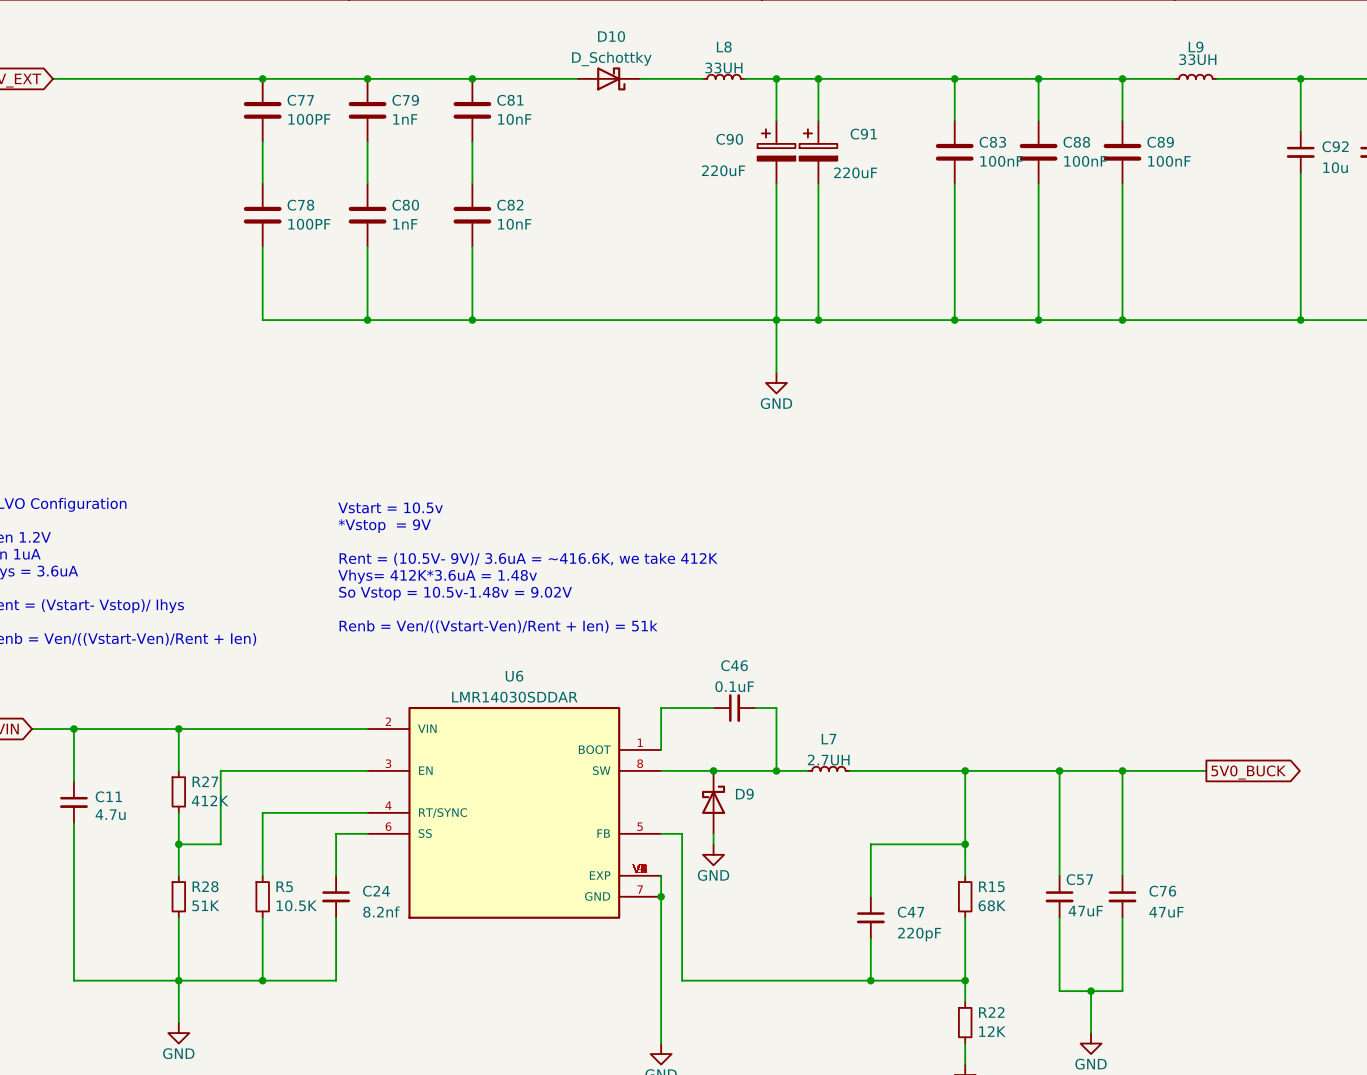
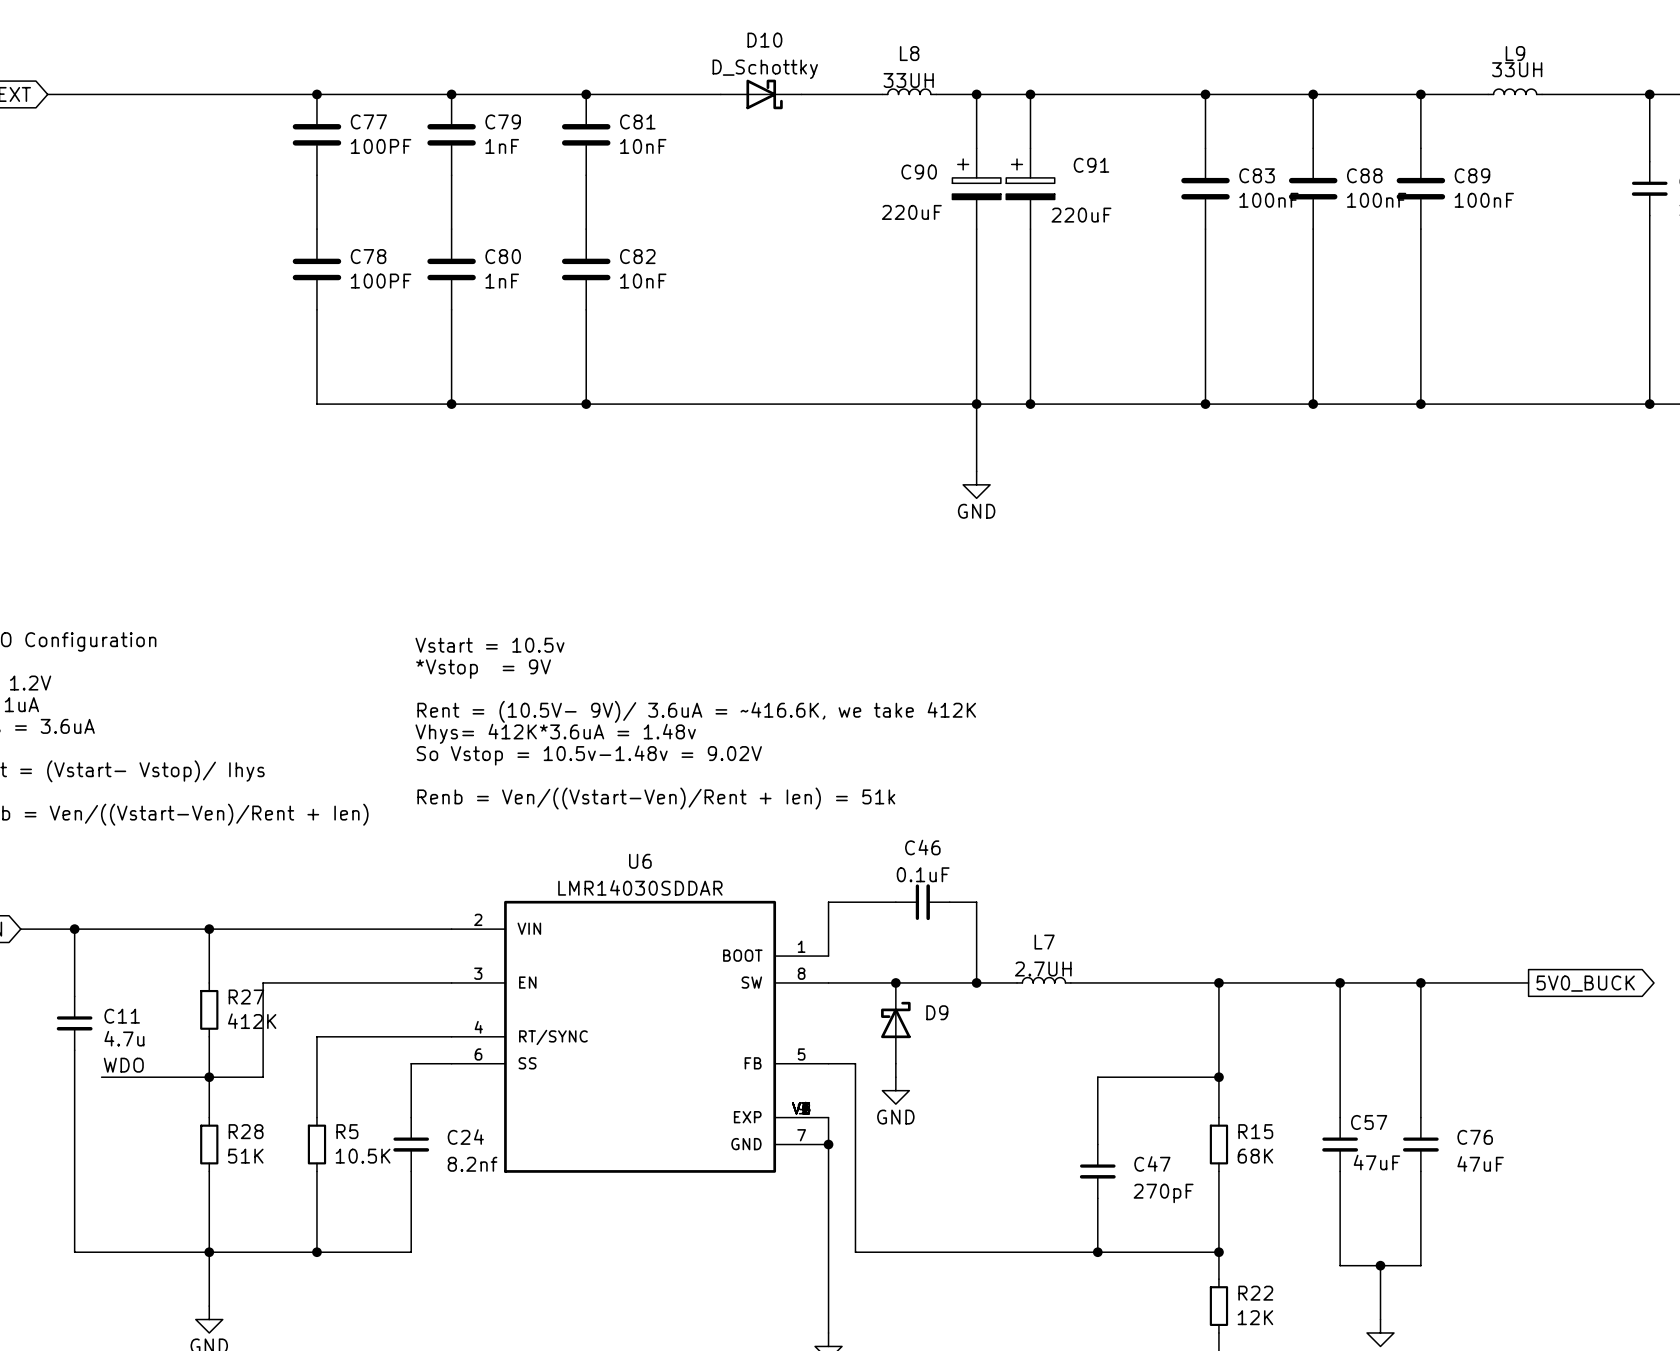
label: none -> WDO (123, 1065)
wire: none -> (101, 1077) (209, 1077)
C47 value: 220pF (919, 934) -> 270pF (1163, 1193)

